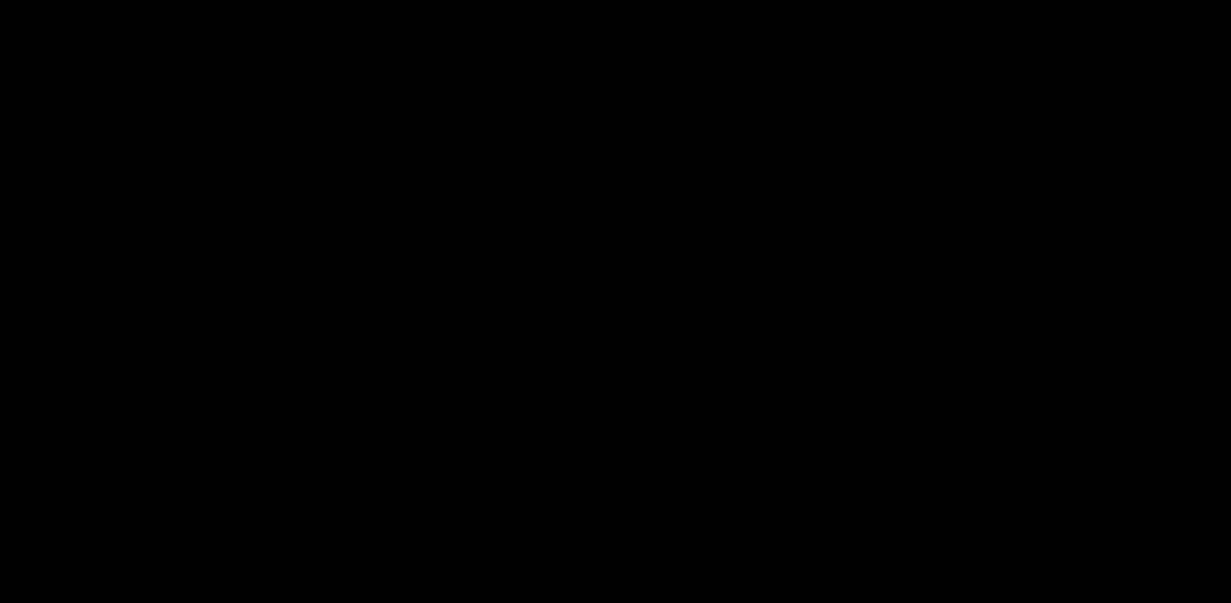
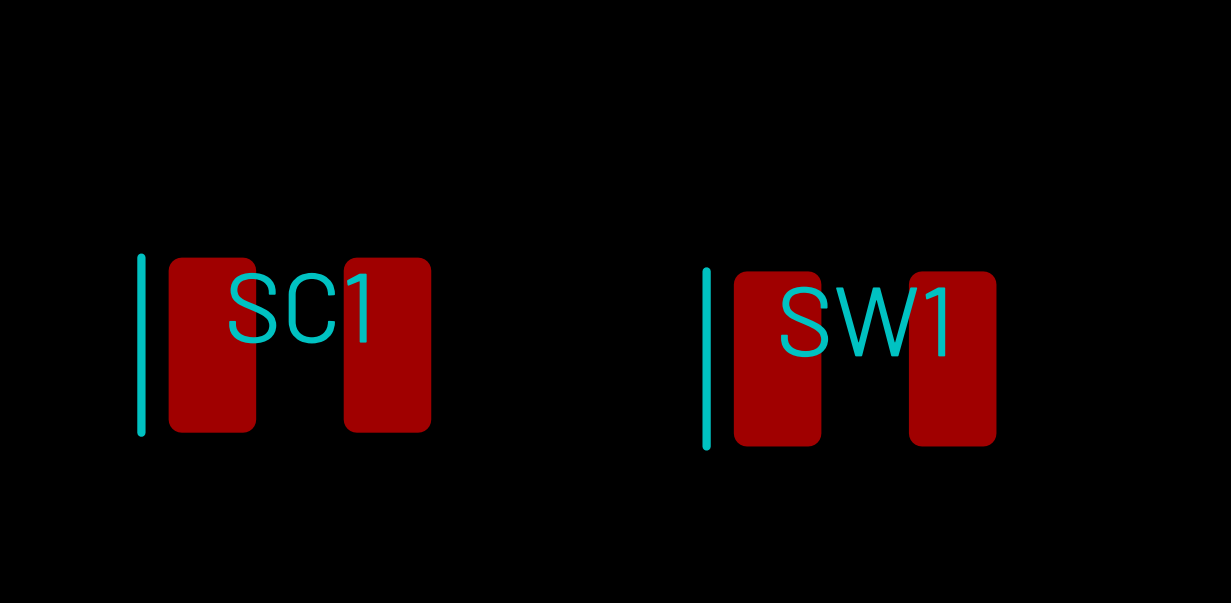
SC1: none -> (284, 345)
SW1: none -> (849, 358)

